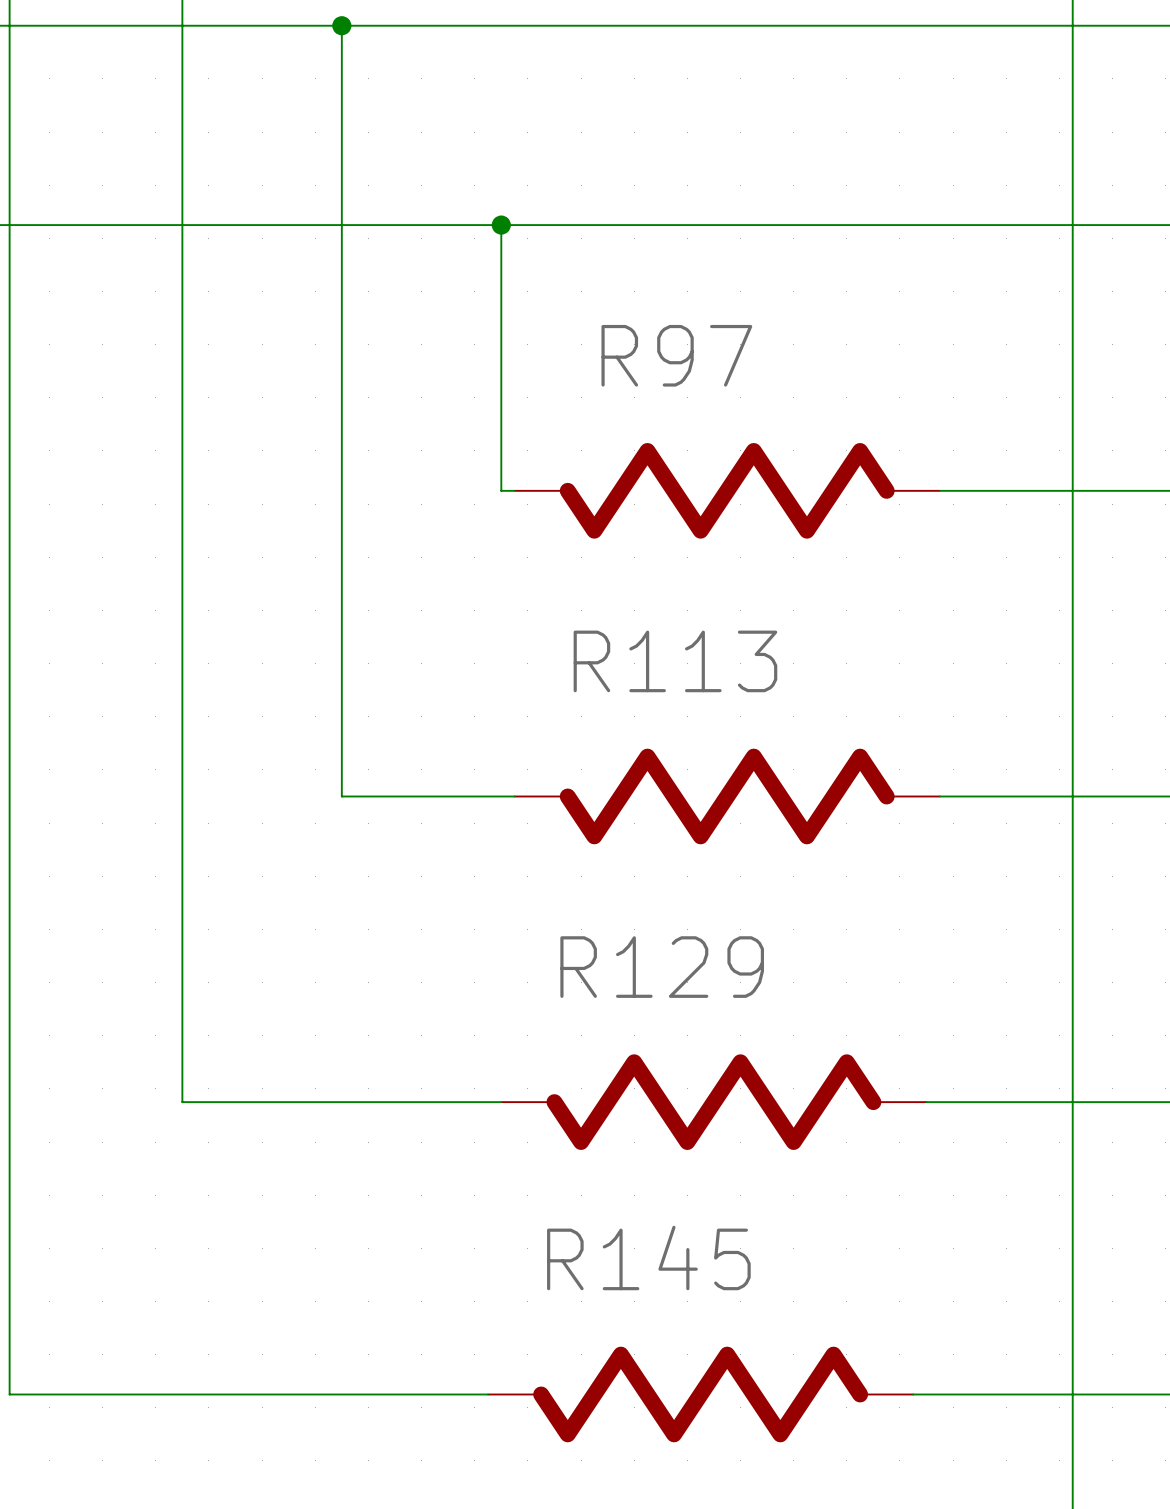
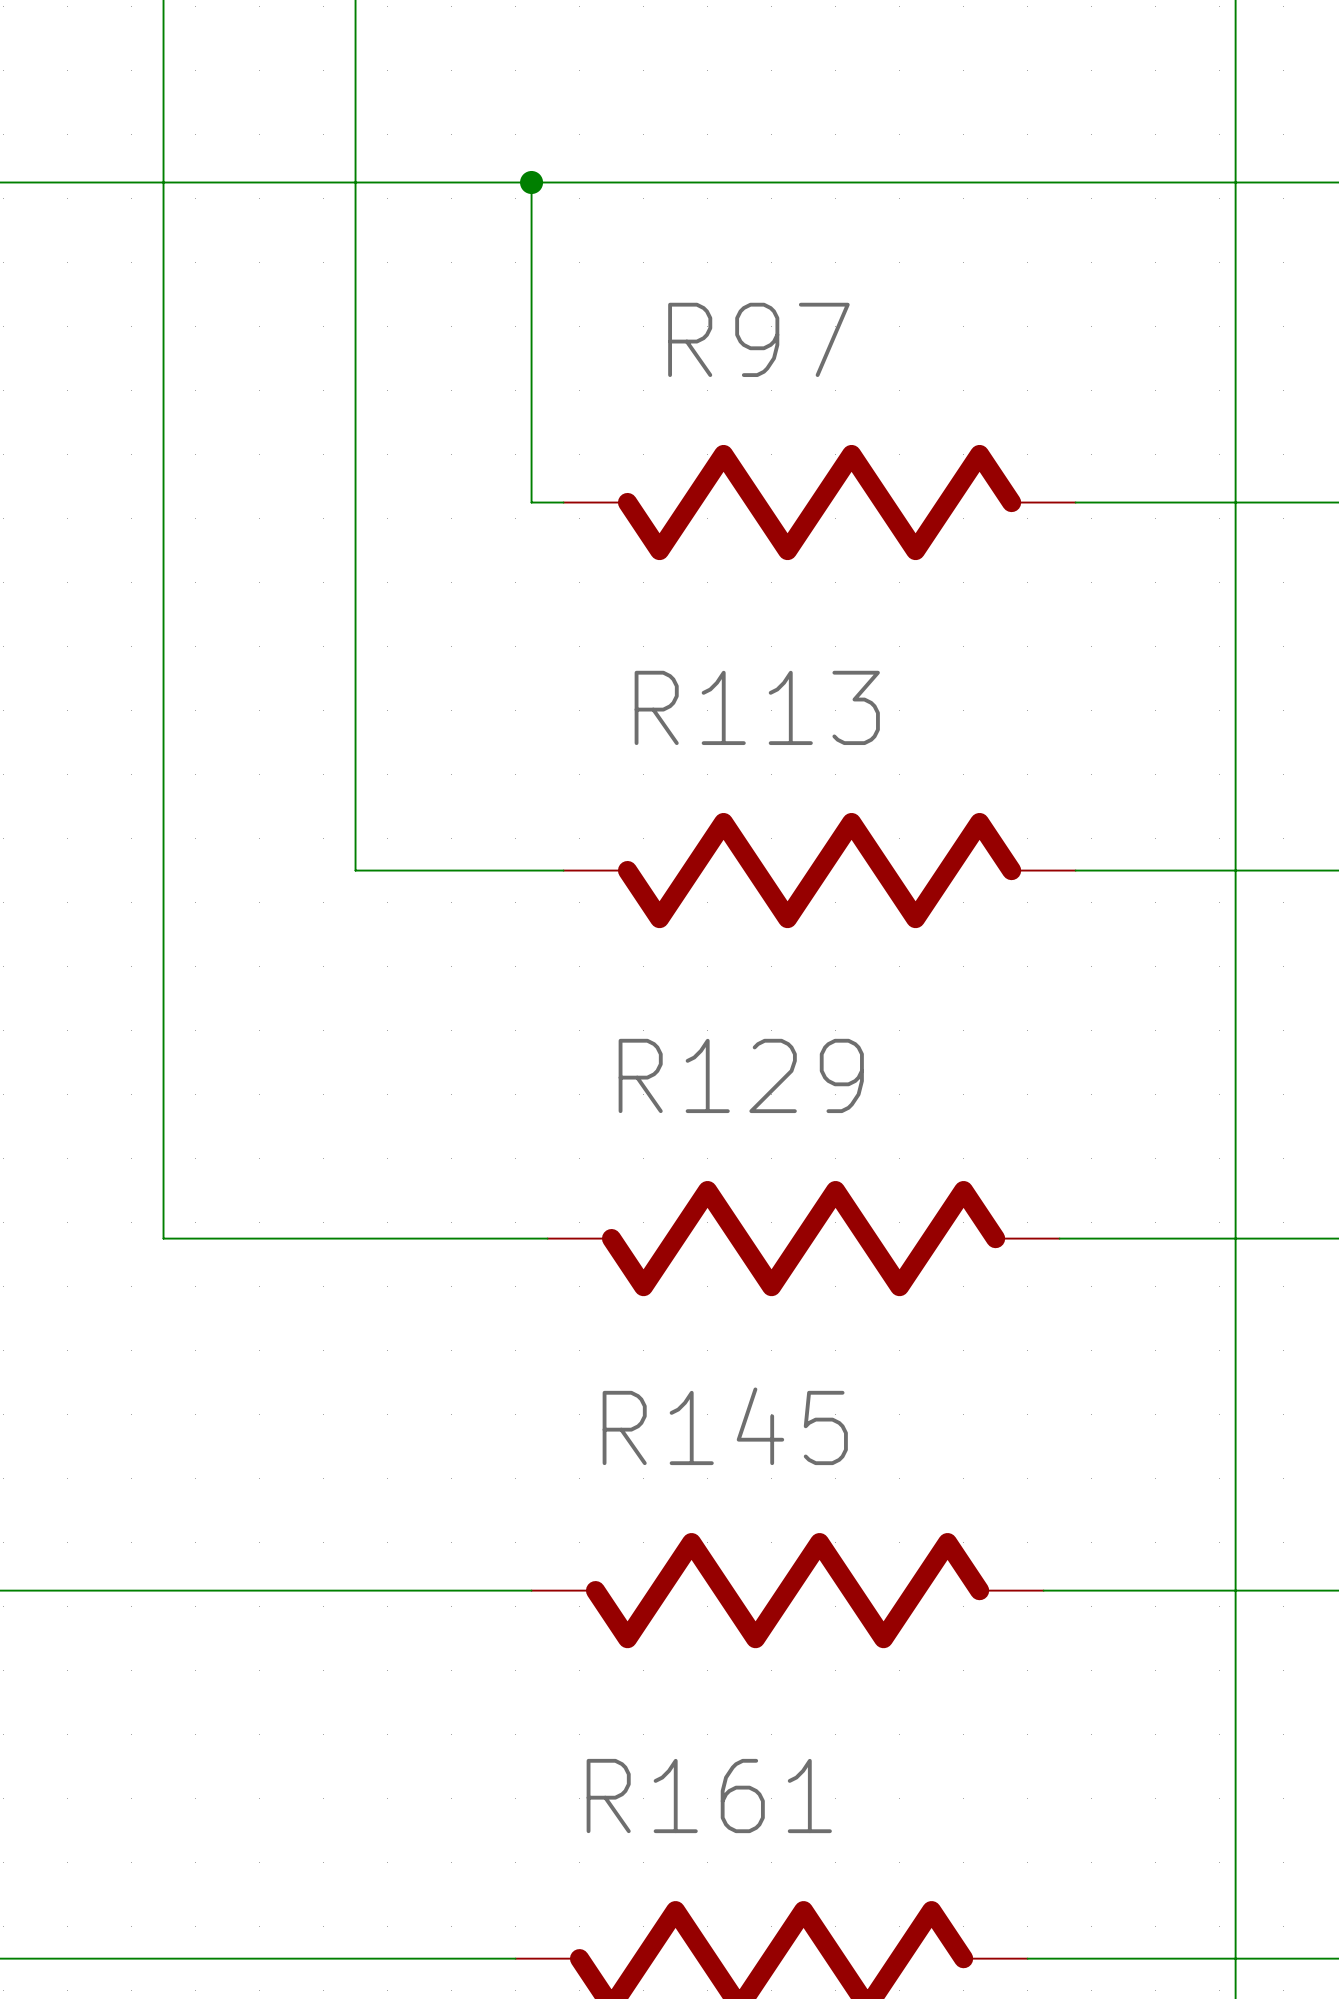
wire: (501, 225) (501, 490) -> (531, 182) (531, 502) (547, 502)
junction position: (501, 225) -> (531, 182)

